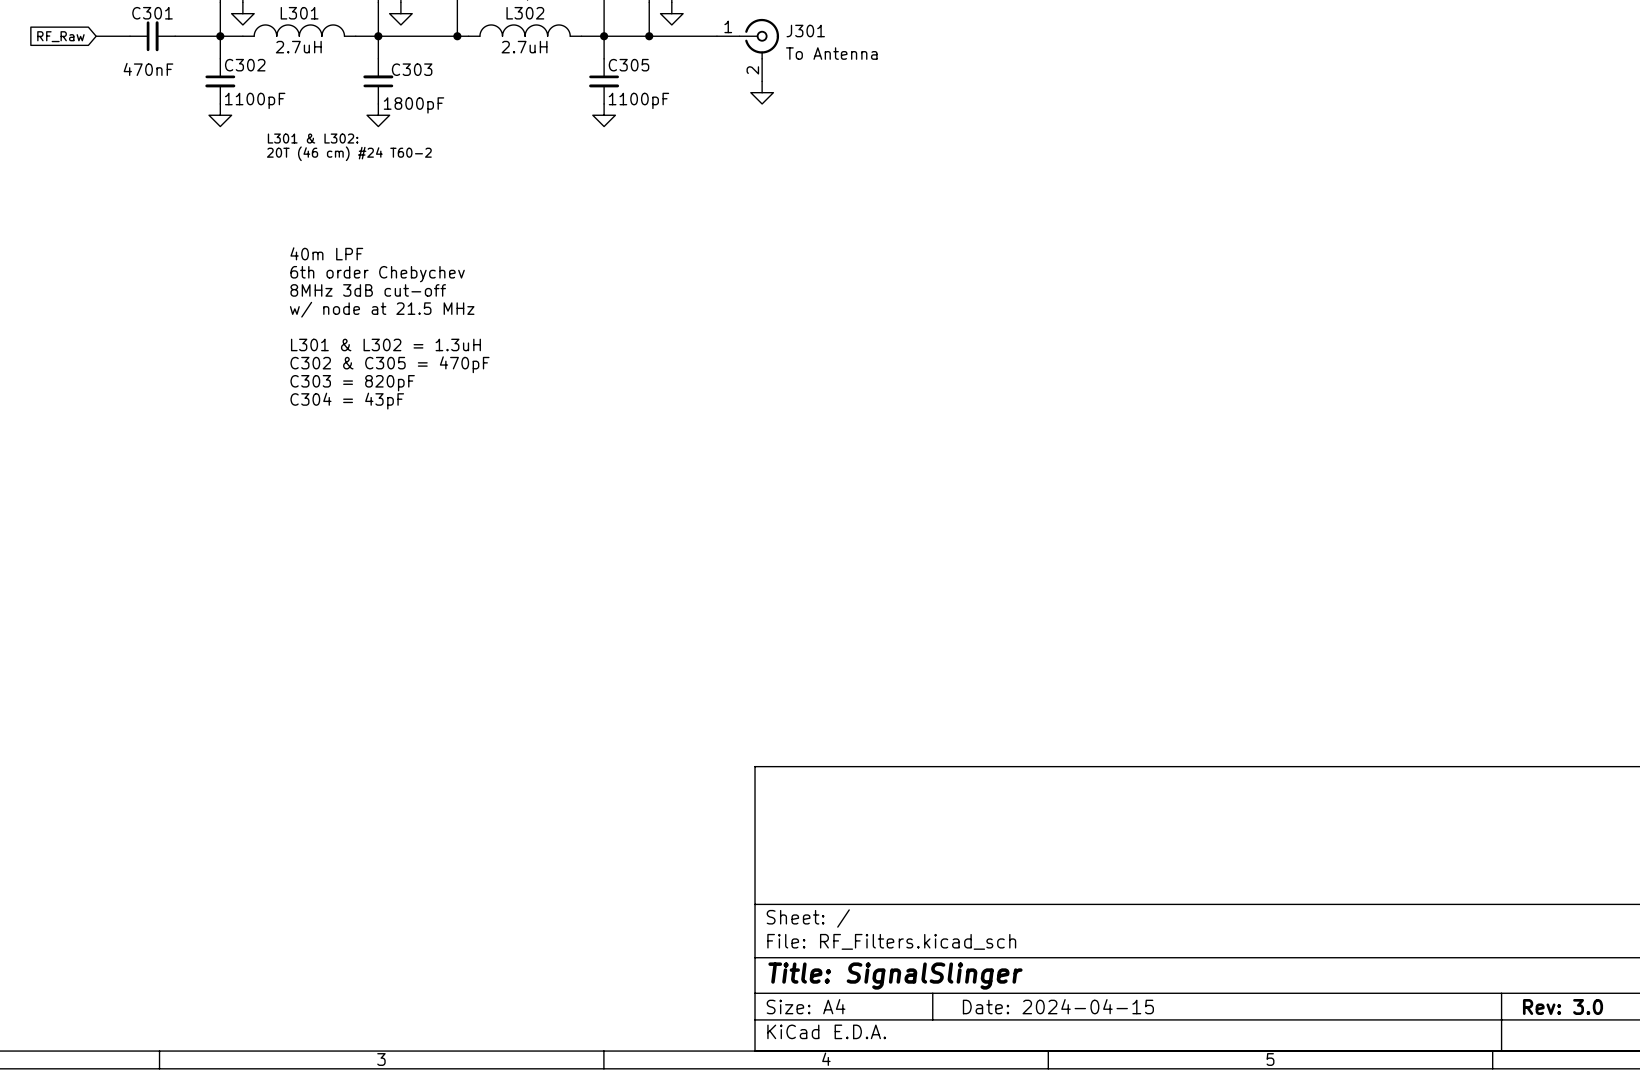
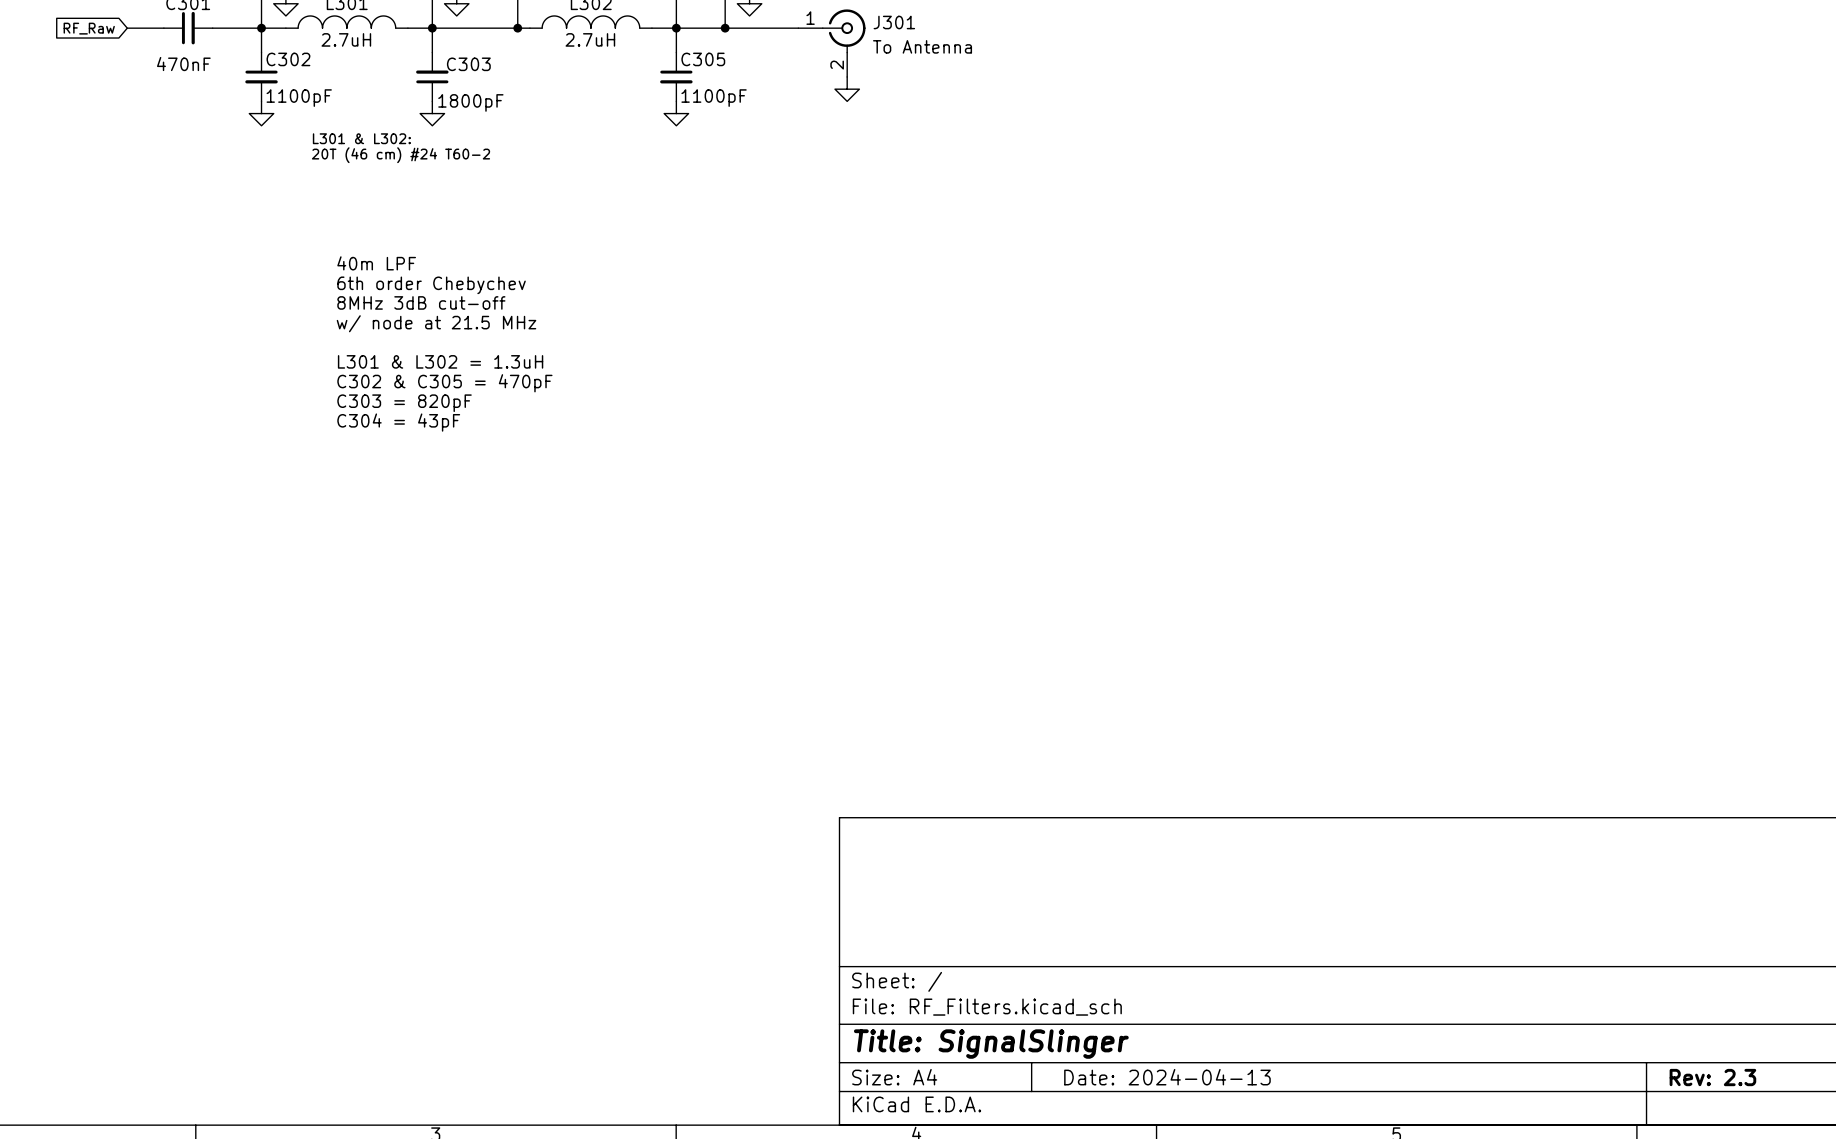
title block: Date: 2024-04-15 (1058, 1006) -> Date: 2024-04-13 (1167, 1077)
title block: Rev: 3.0 (1563, 1007) -> Rev: 2.3 (1712, 1077)

